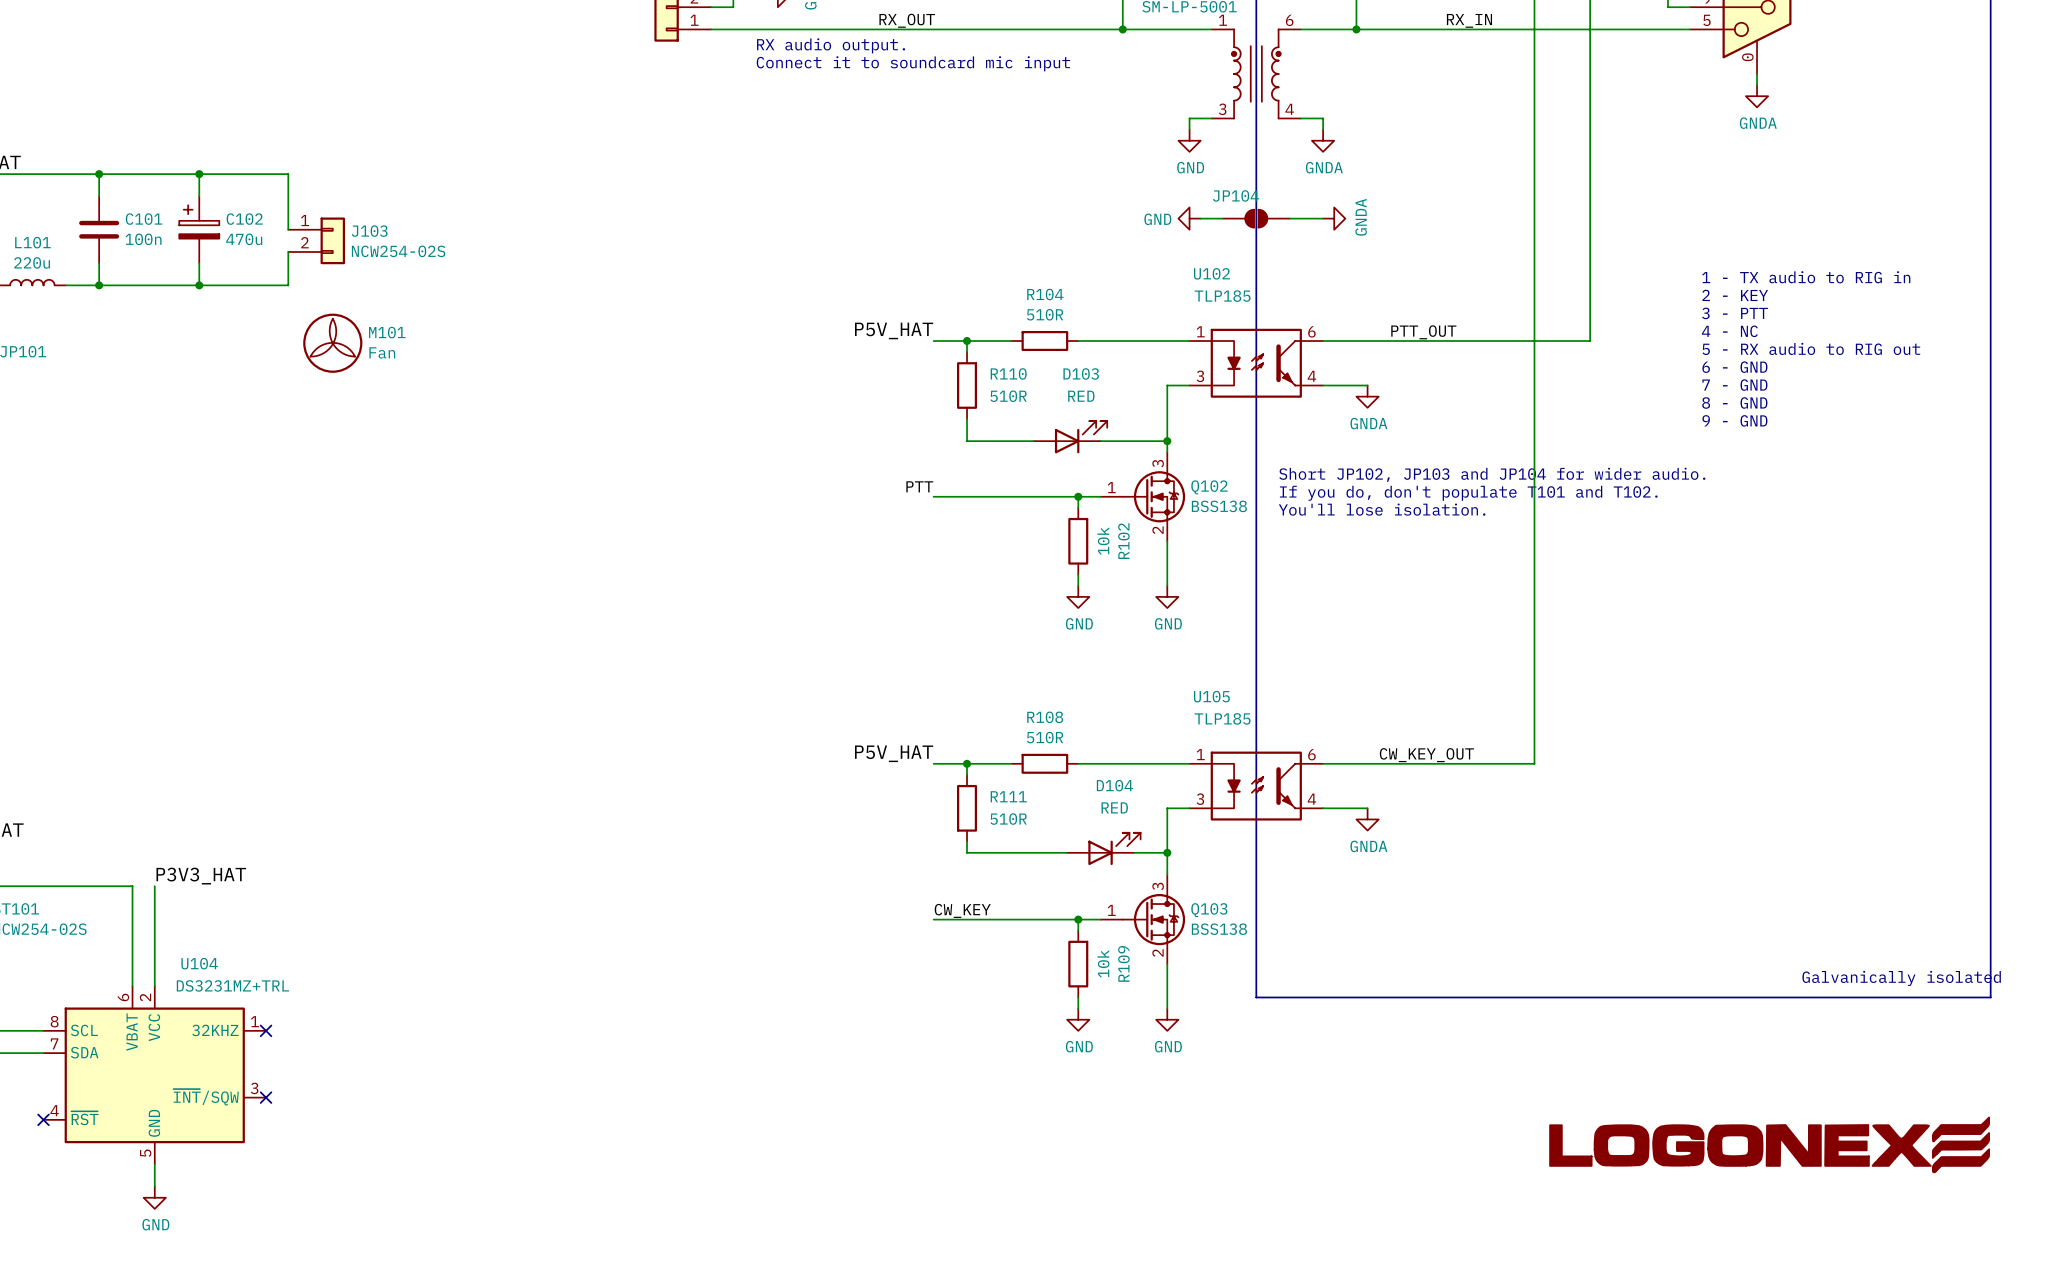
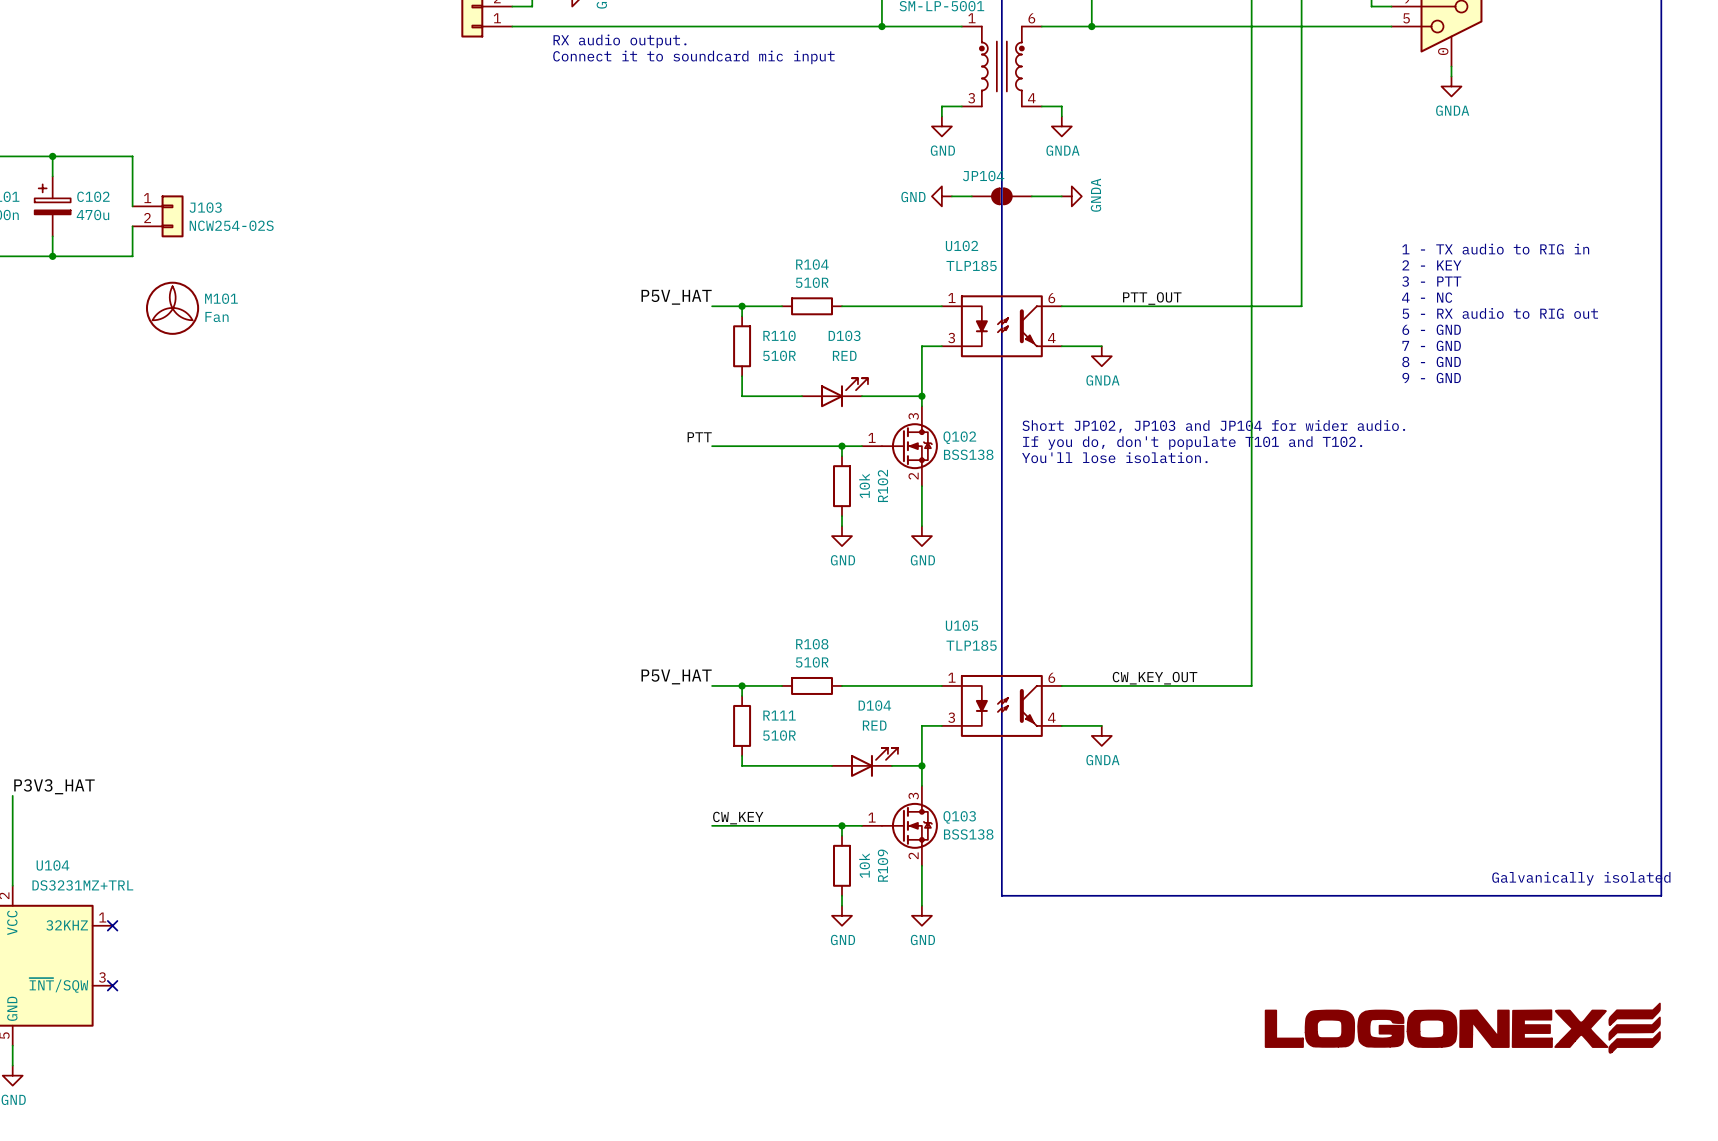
label: RX_OUT (907, 20) -> none
label: RX_IN (1469, 20) -> none

